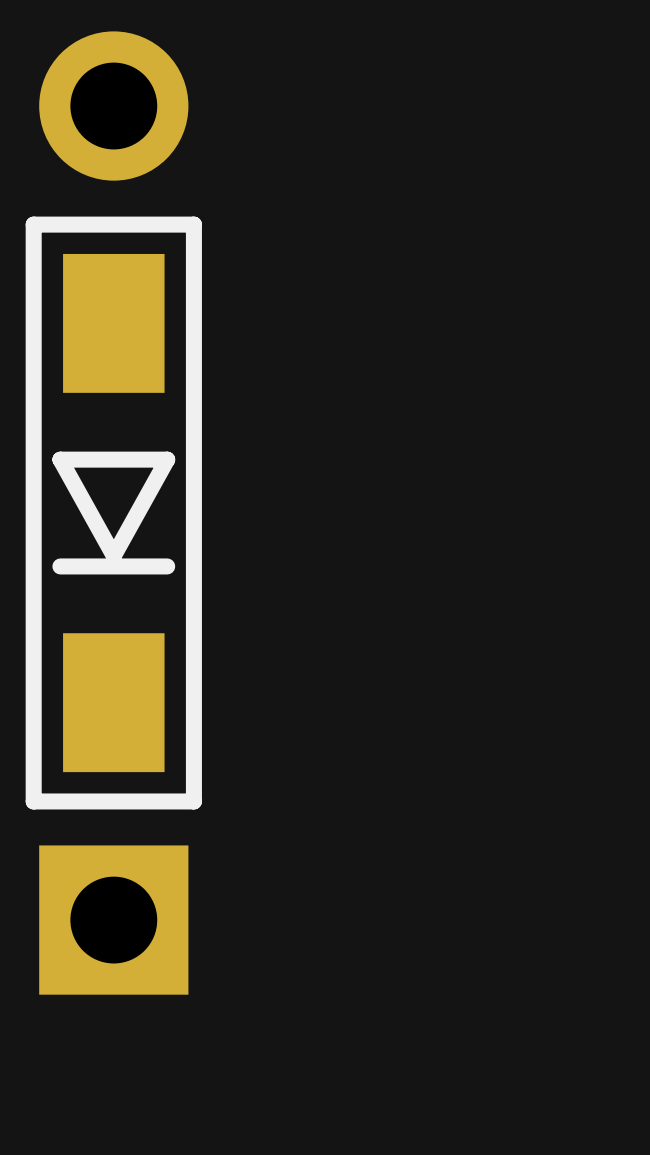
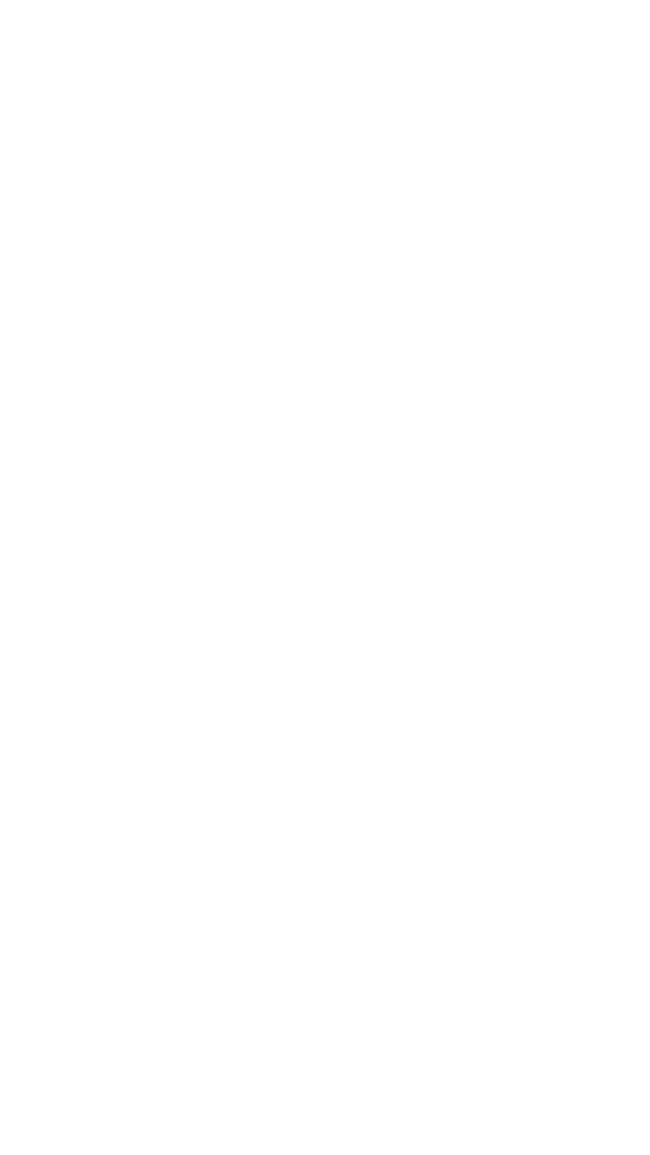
part: (113, 513) -> none

